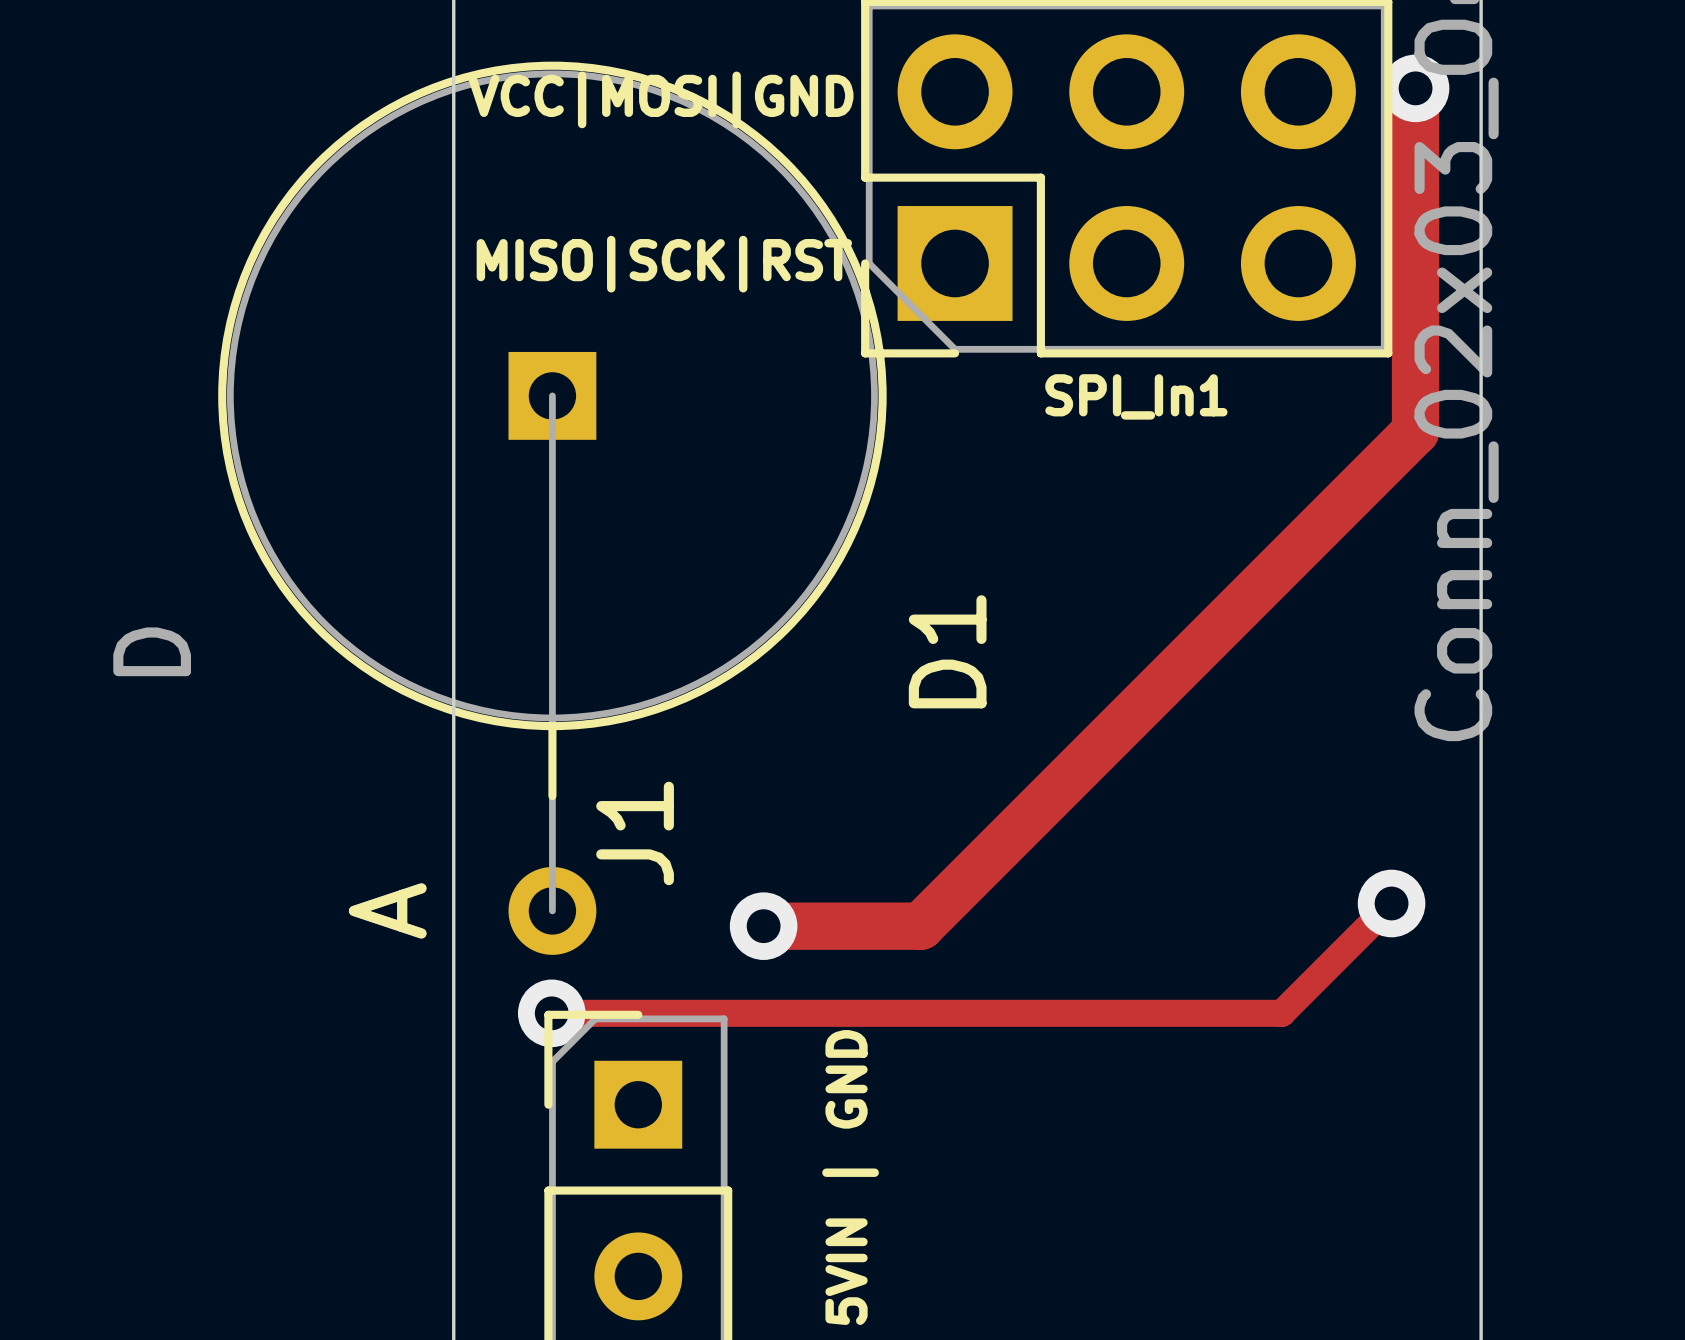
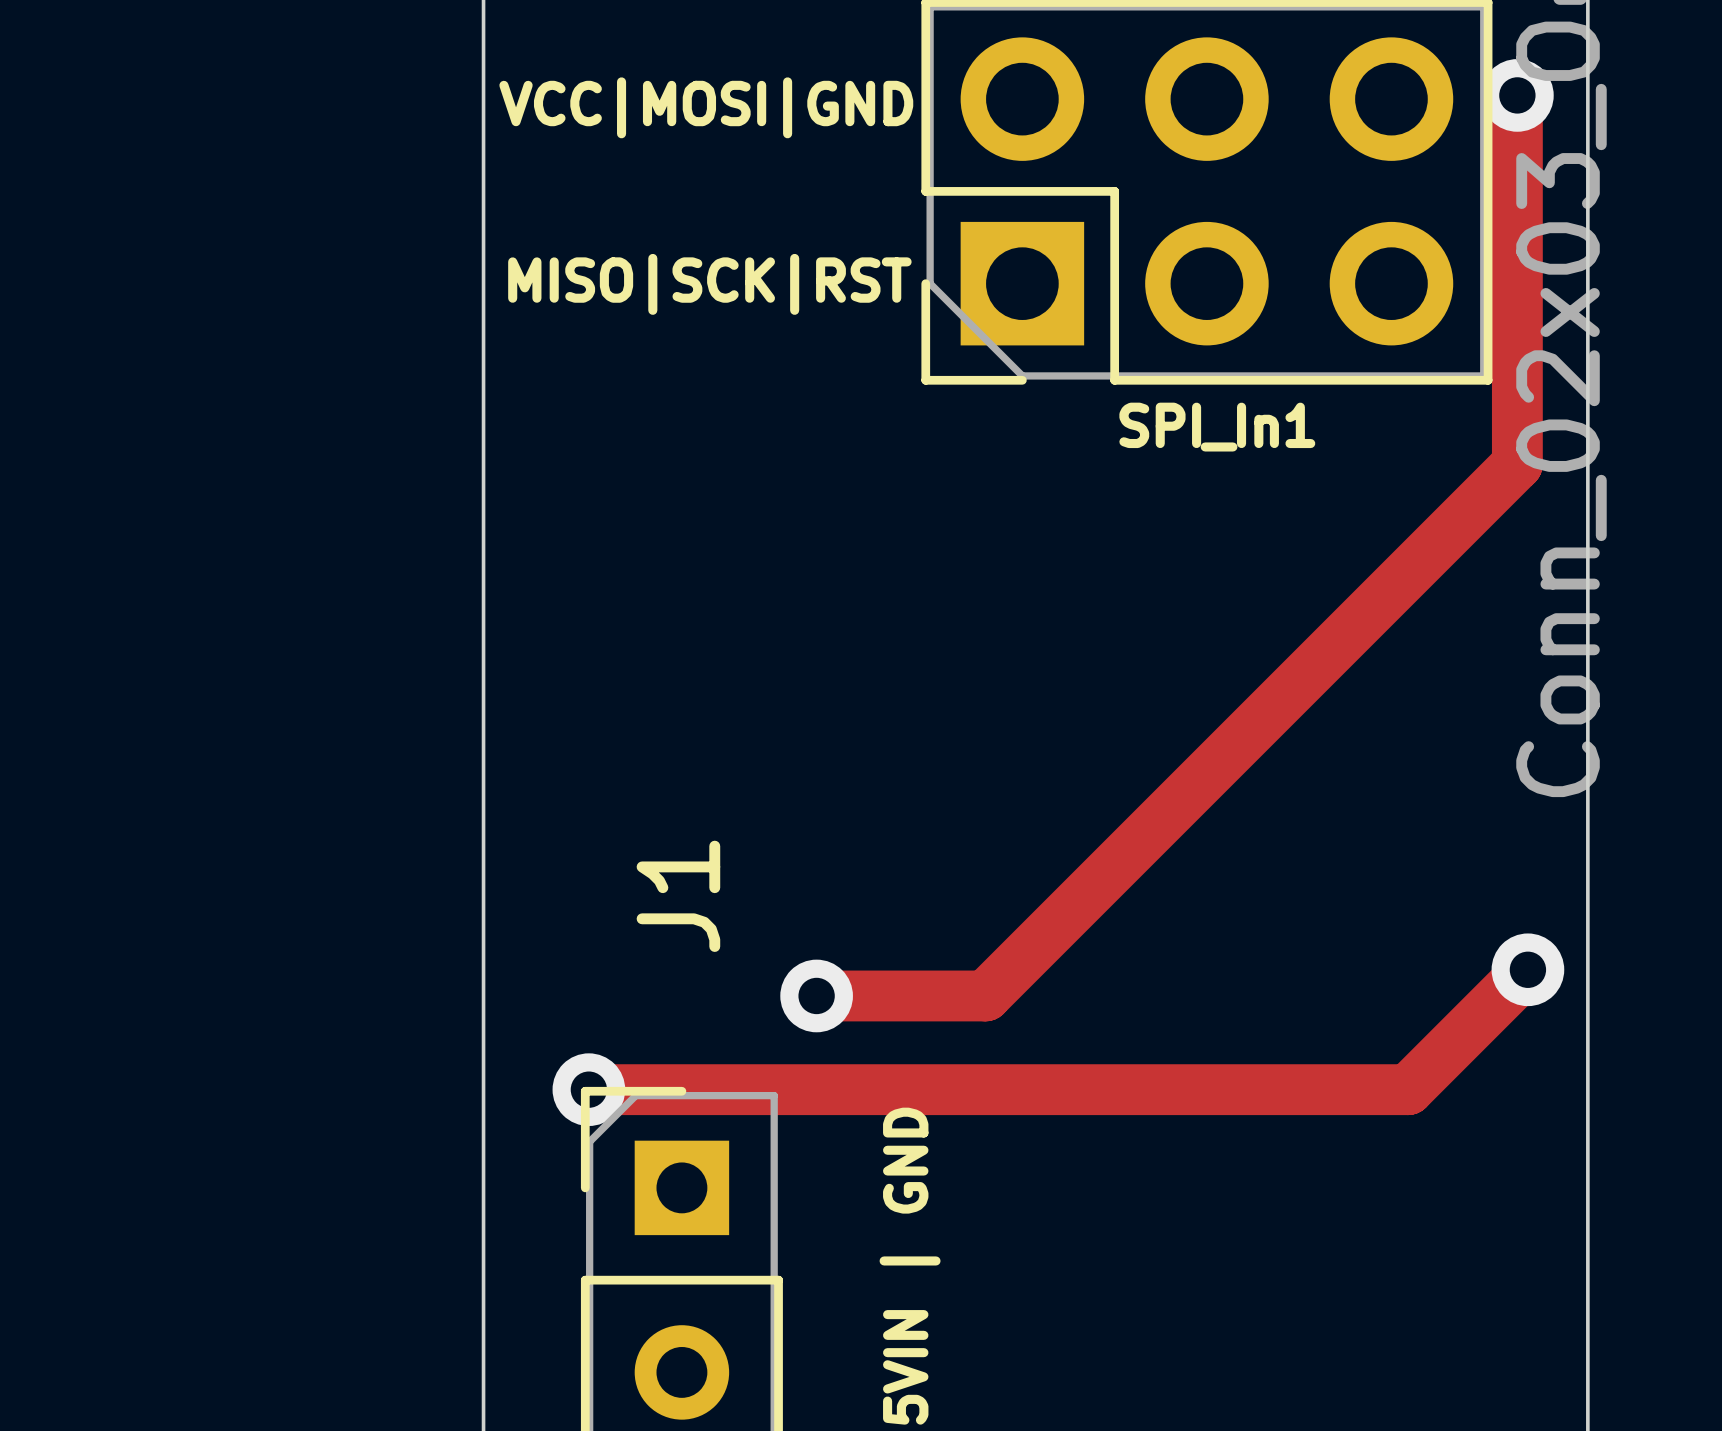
D1: D (552, 508) -> none
track: (1391, 903) (1281, 1013) -> (1527, 969) (1408, 1089) (1373, 1089)
via position: (1391, 903) -> (1527, 969)
track width: thin (551, 1013) (1281, 1013) -> thick (588, 1089) (1373, 1089)

